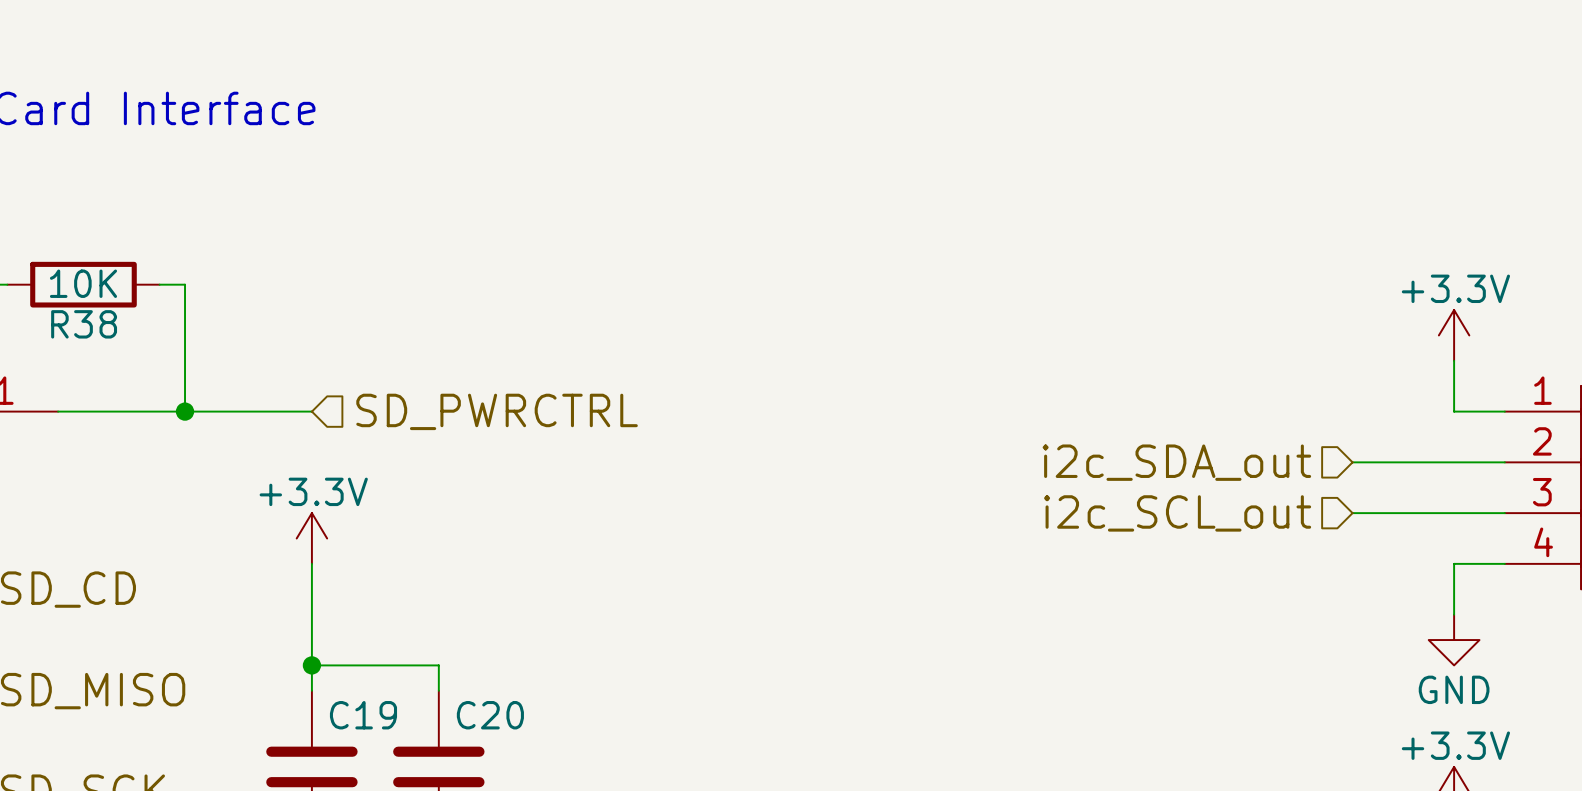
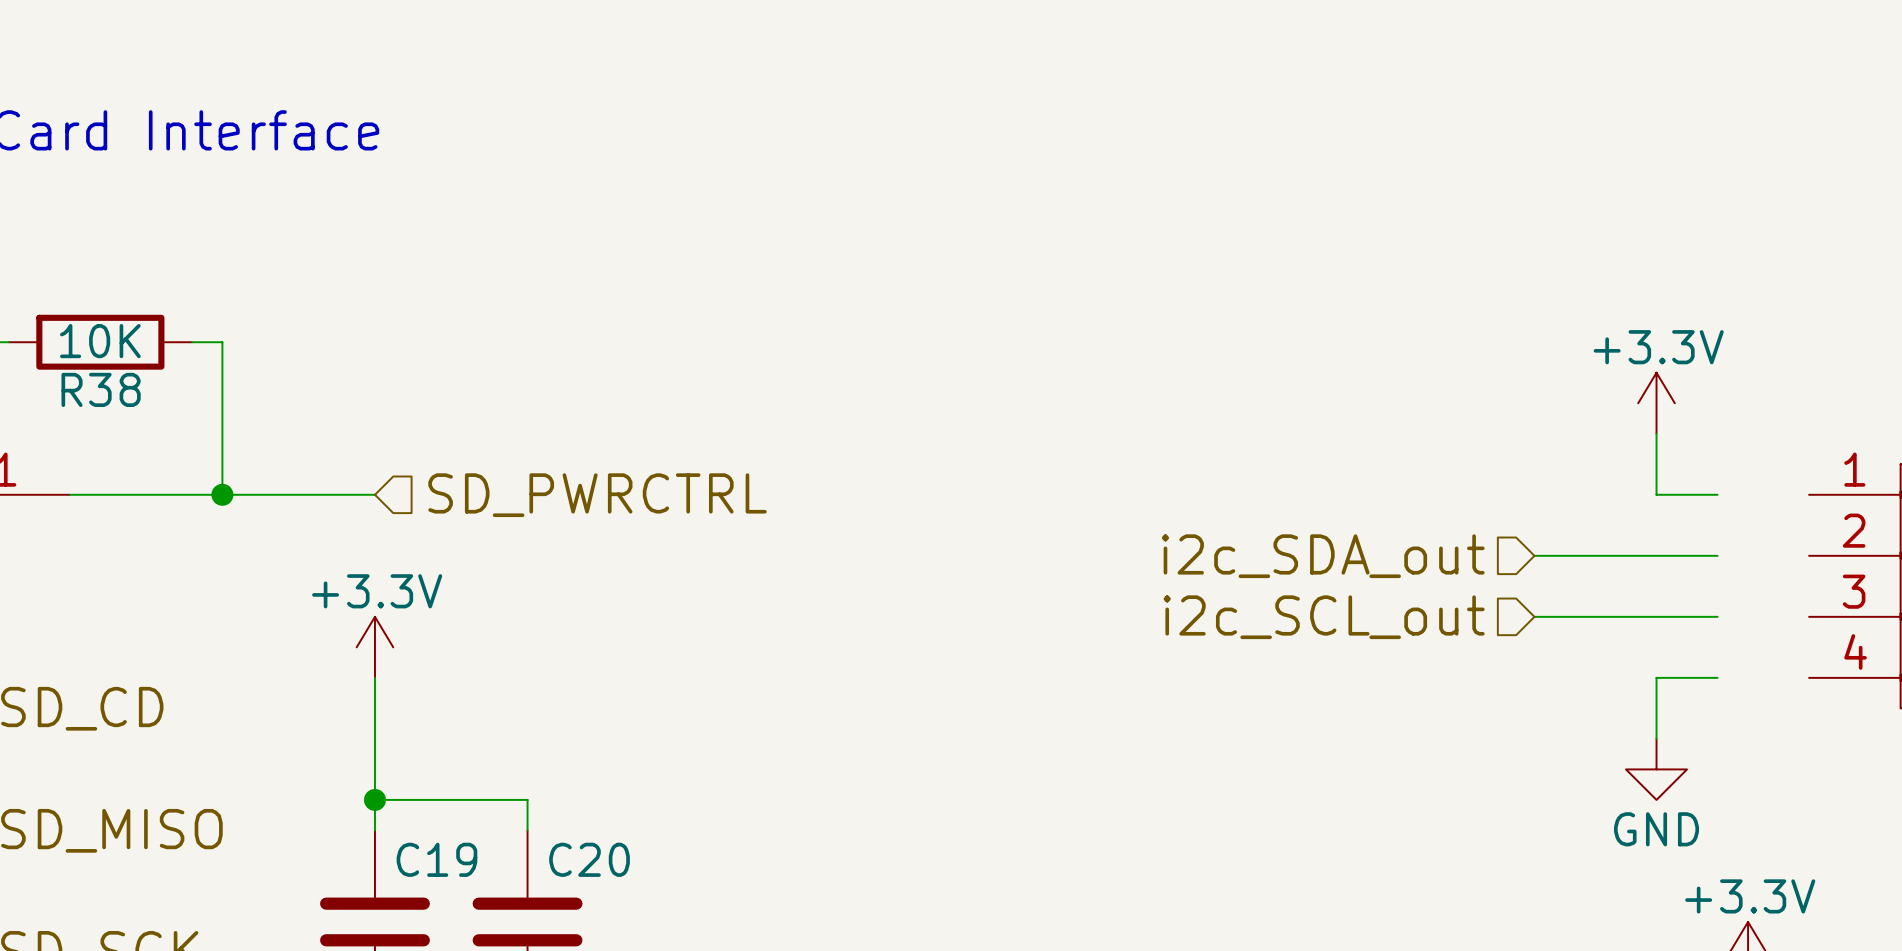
power symbol position: +3.3V (1454, 335) -> +3.3V (1656, 403)
wire: (1454, 360) (1454, 411) (1504, 411) -> (1656, 433) (1656, 494) (1717, 494)
hierarchical label position: i2c_SDA_out (1176, 462) -> i2c_SDA_out (1323, 556)
wire: (1428, 462) (1504, 462) -> (1534, 555) (1626, 555)
hierarchical label position: i2c_SCL_out (1177, 513) -> i2c_SCL_out (1324, 617)
wire: (1428, 513) (1504, 513) -> (1534, 616) (1626, 616)
wire: (1504, 563) (1454, 563) (1454, 614) -> (1717, 677) (1656, 677) (1656, 738)
power symbol position: GND (1454, 640) -> GND (1656, 769)

